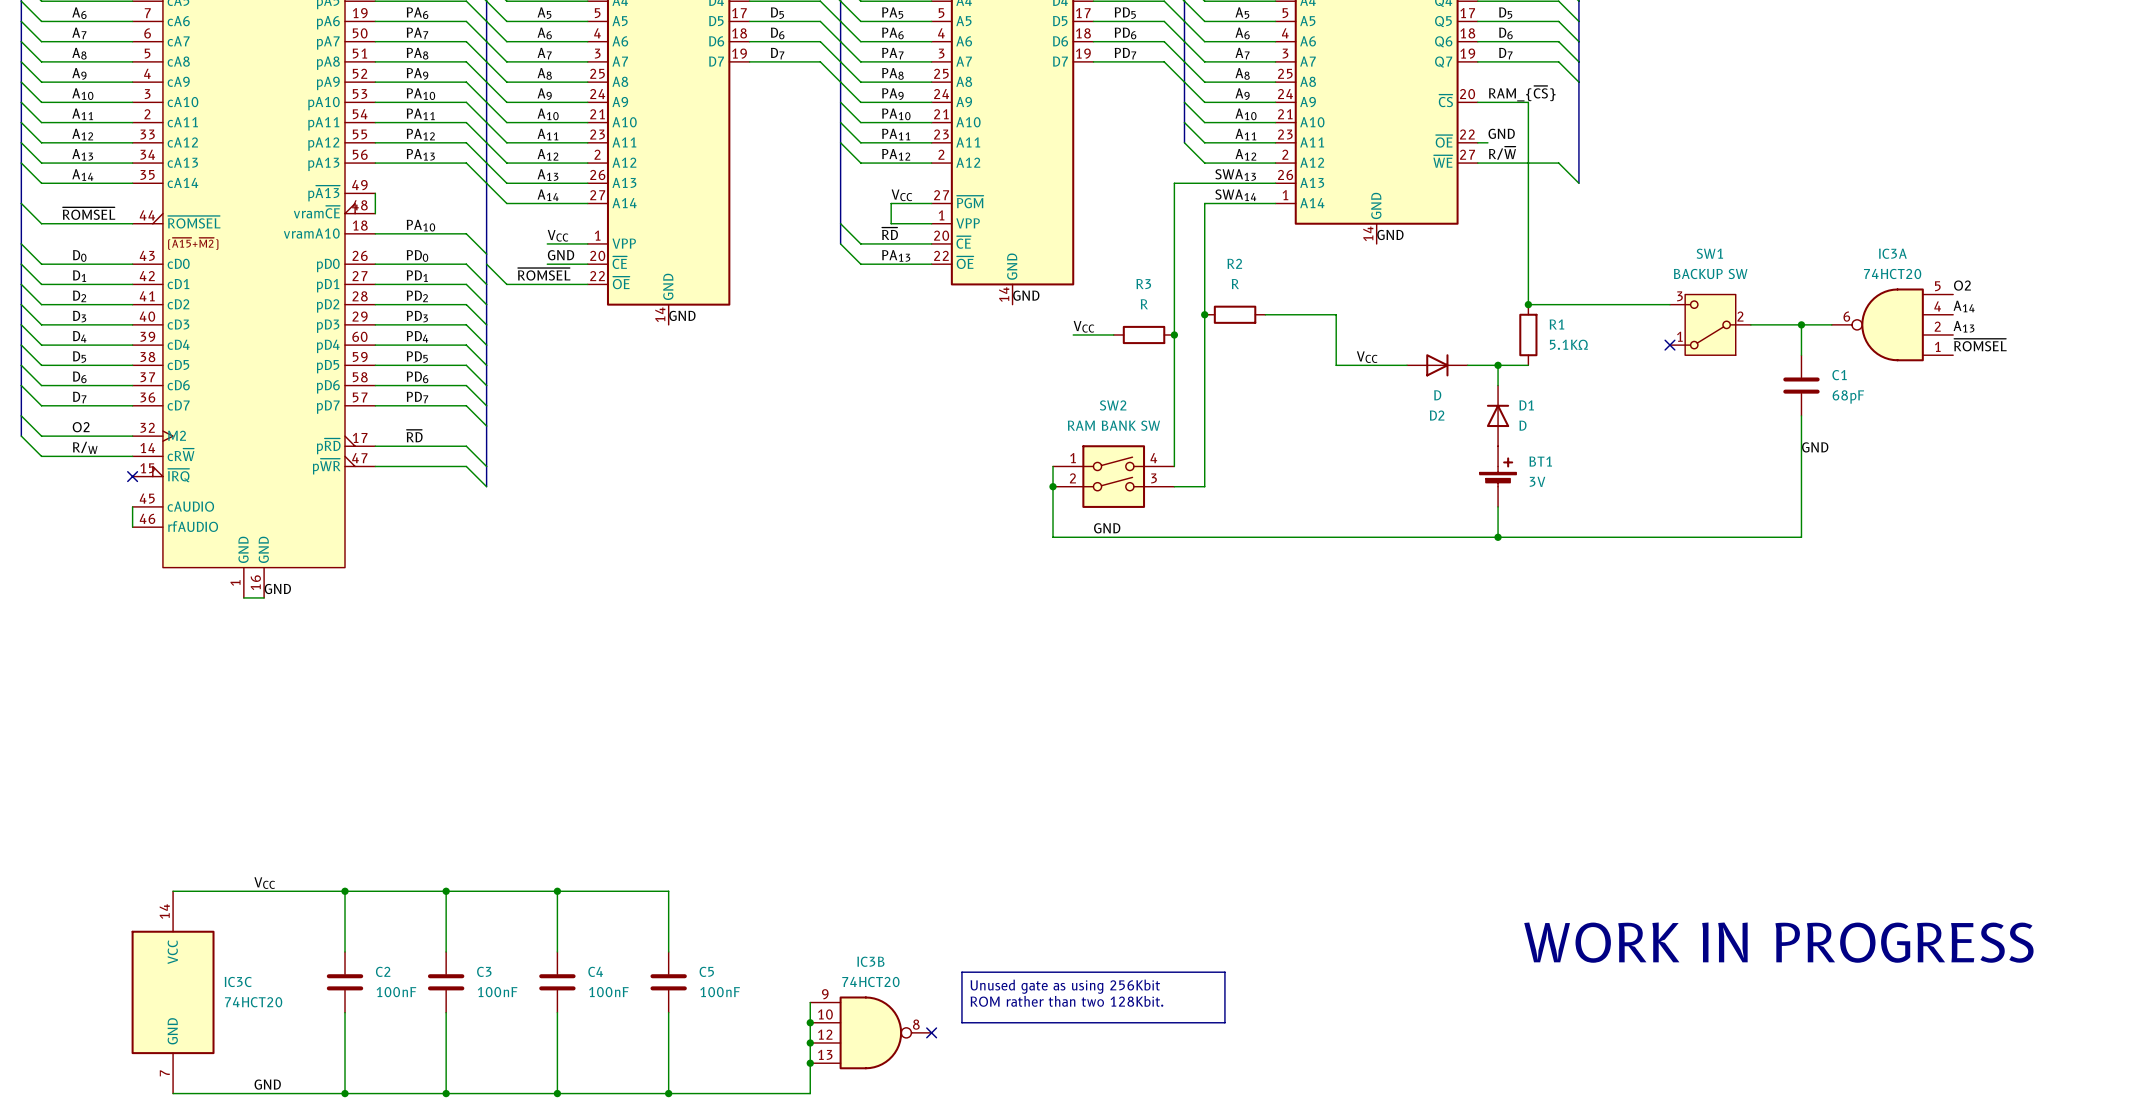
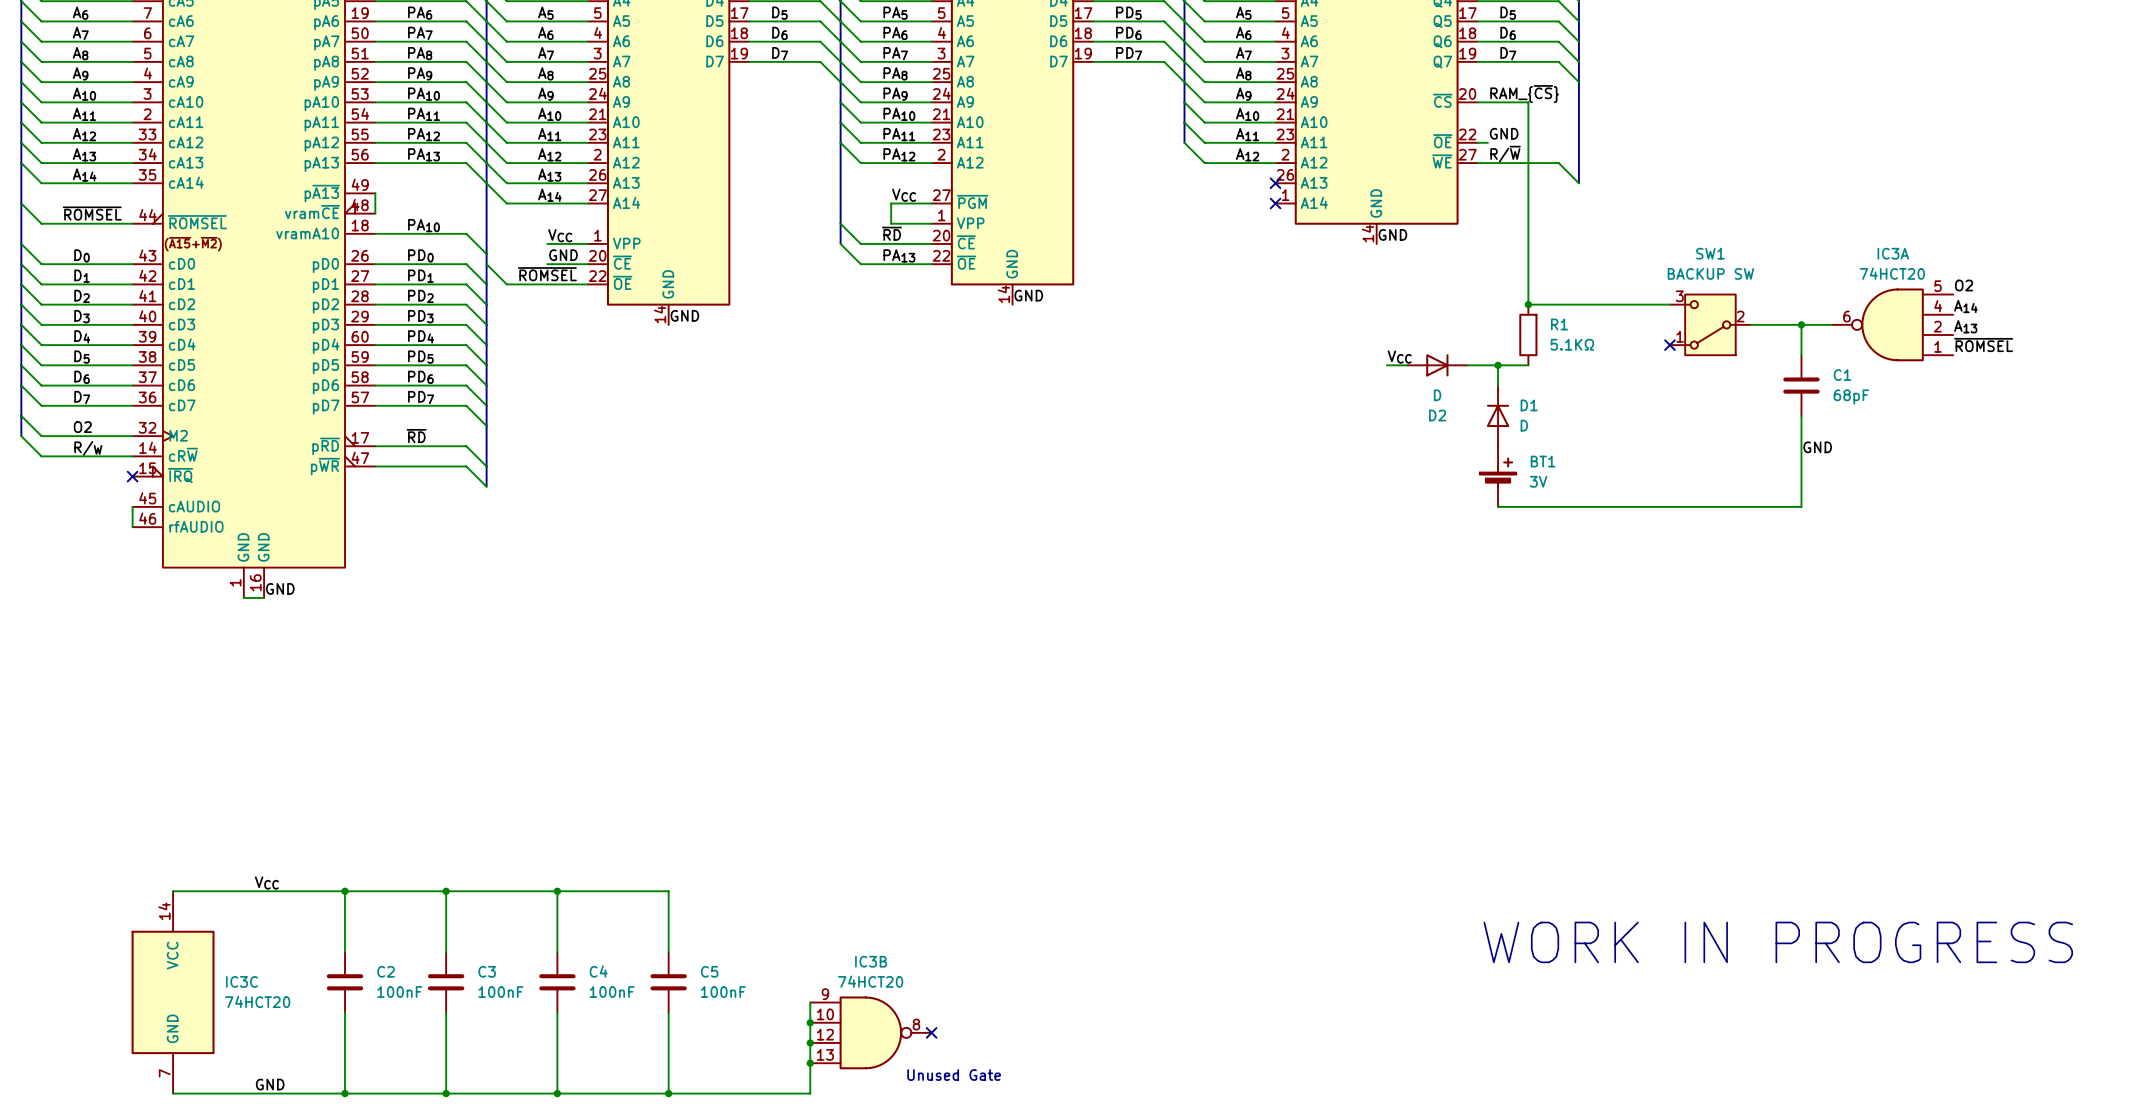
label: SWA13 (1235, 175) -> none
wire: (1275, 183) (1174, 183) (1174, 466) -> none
no-connect mark: none -> (1275, 183)
label: SWA14 (1235, 195) -> none
wire: (1275, 203) (1204, 203) (1204, 486) (1174, 486) -> none
no-connect mark: none -> (1275, 203)
junction: (1204, 314) -> none
R2: R (1235, 314) -> none
wire: (1265, 314) (1336, 314) (1336, 365) (1386, 365) -> none
label: VCC (1083, 326) -> none
wire: (1073, 334) (1113, 334) -> none
R3: R (1144, 334) -> none
junction: (1174, 334) -> none
label position: VCC (1367, 357) -> VCC (1399, 357)
wire: (1053, 466) (1053, 537) (1801, 537) (1801, 506) -> none
SW2: RAM BANK SW (1113, 476) -> none
junction: (1053, 486) -> none
wire: (1498, 506) (1498, 537) -> (1498, 506) (1801, 506)
label: GND (1107, 528) -> none
junction: (1498, 537) -> none
line: (961, 972) (1224, 972) (1224, 1022) (961, 1022) (961, 972) -> none
text: Unused gate as using 256Kbit (1065, 986) -> none
text: ROM rather than two 128Kbit. (1066, 1001) -> none
text: none -> Unused Gate (954, 1075)

